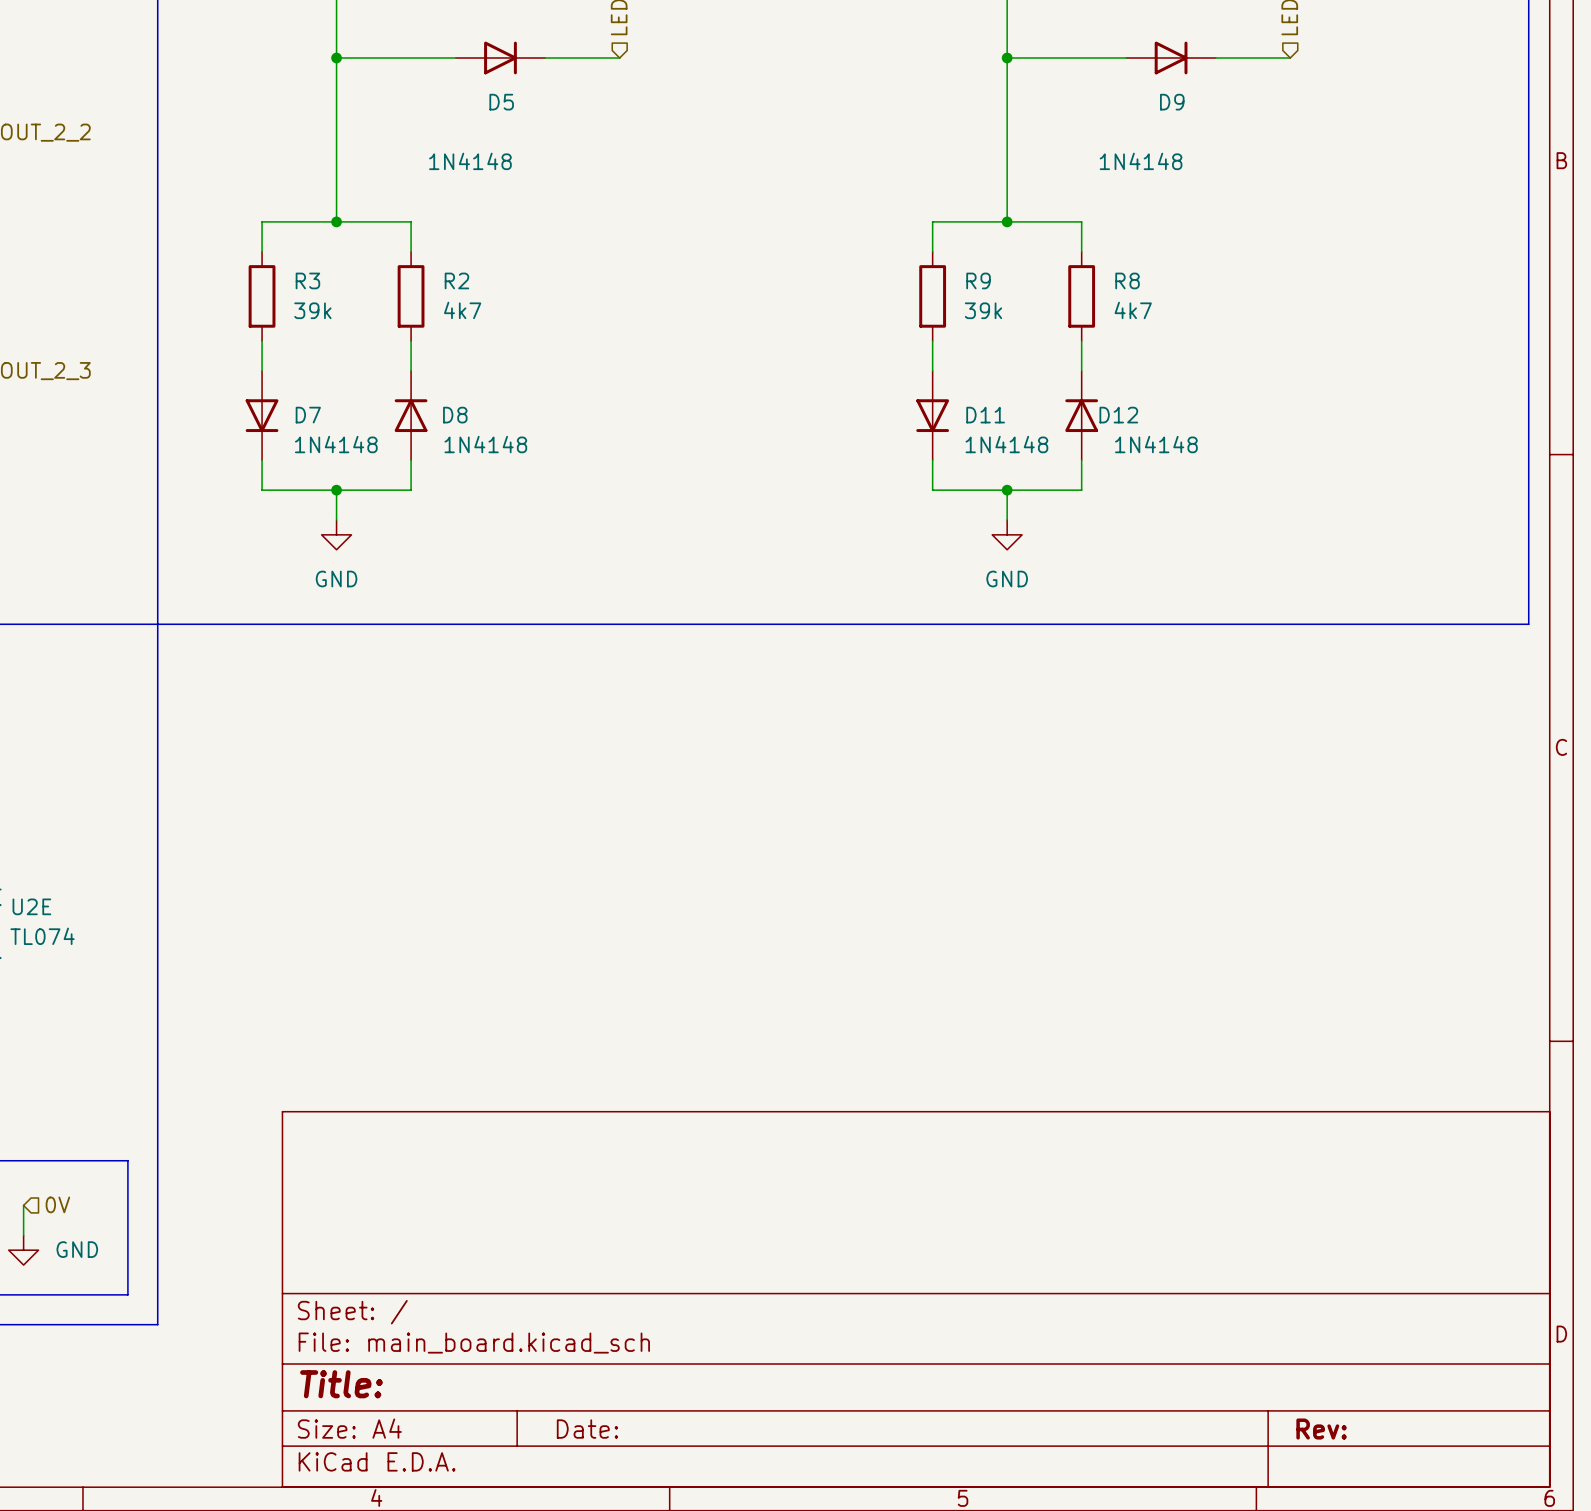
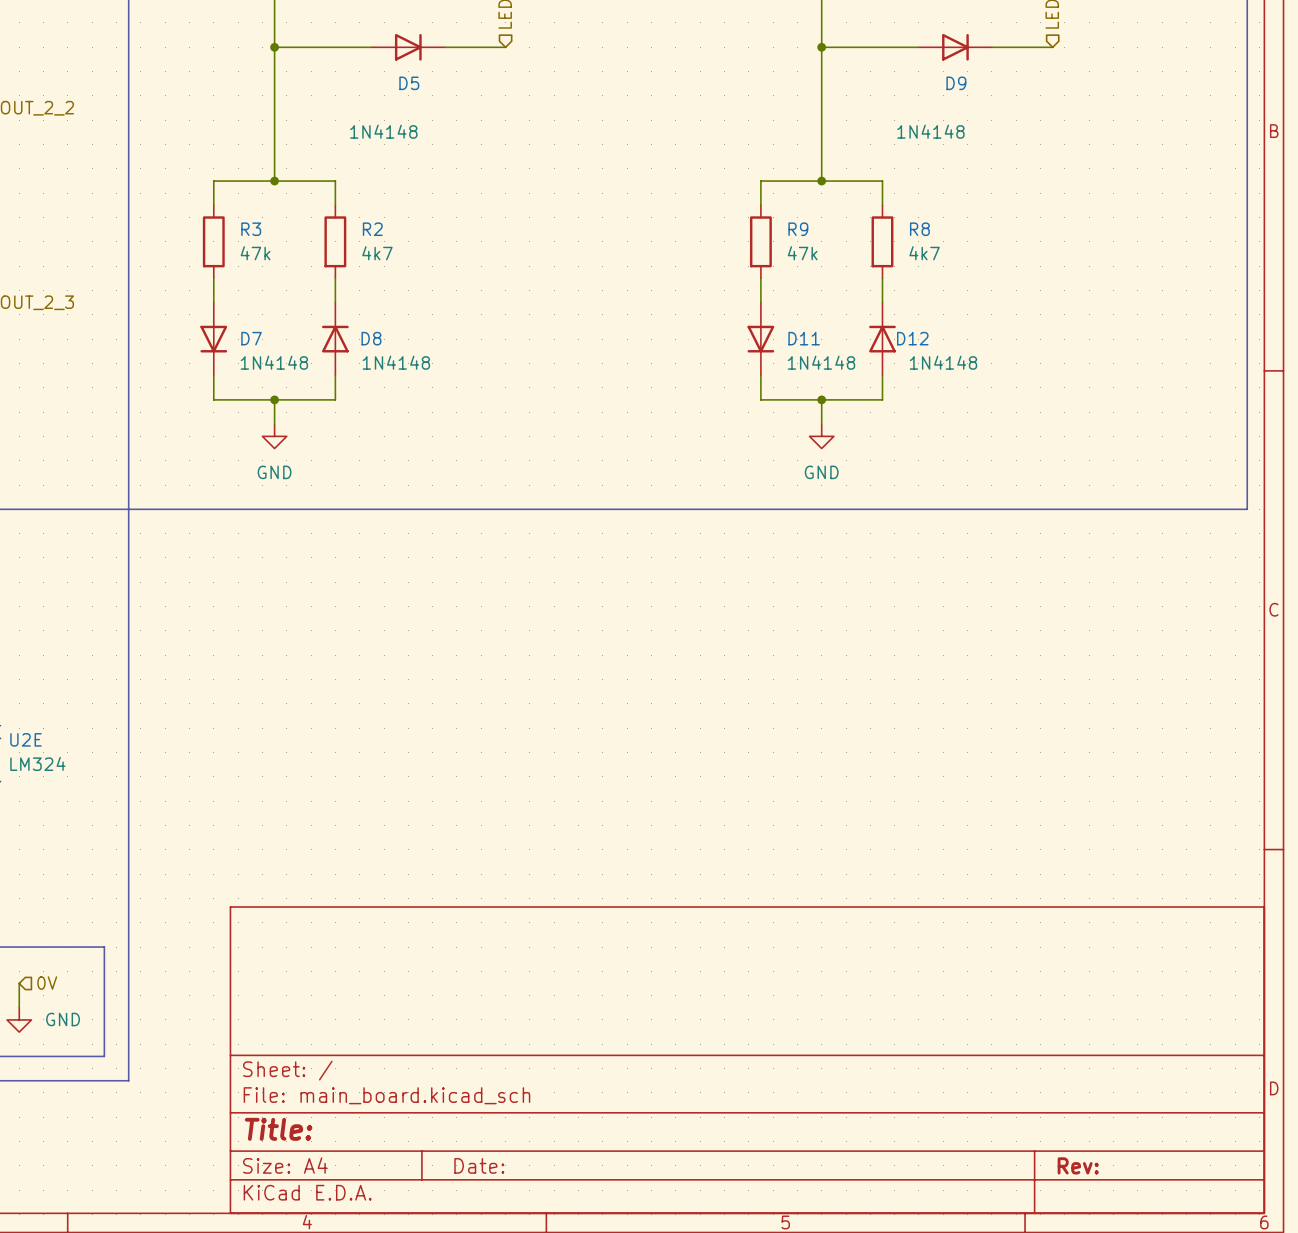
R3 value: 39k (312, 310) -> 47k (255, 253)
R9 value: 39k (983, 310) -> 47k (802, 253)
U2E value: TL074 (42, 936) -> LM324 (37, 763)

